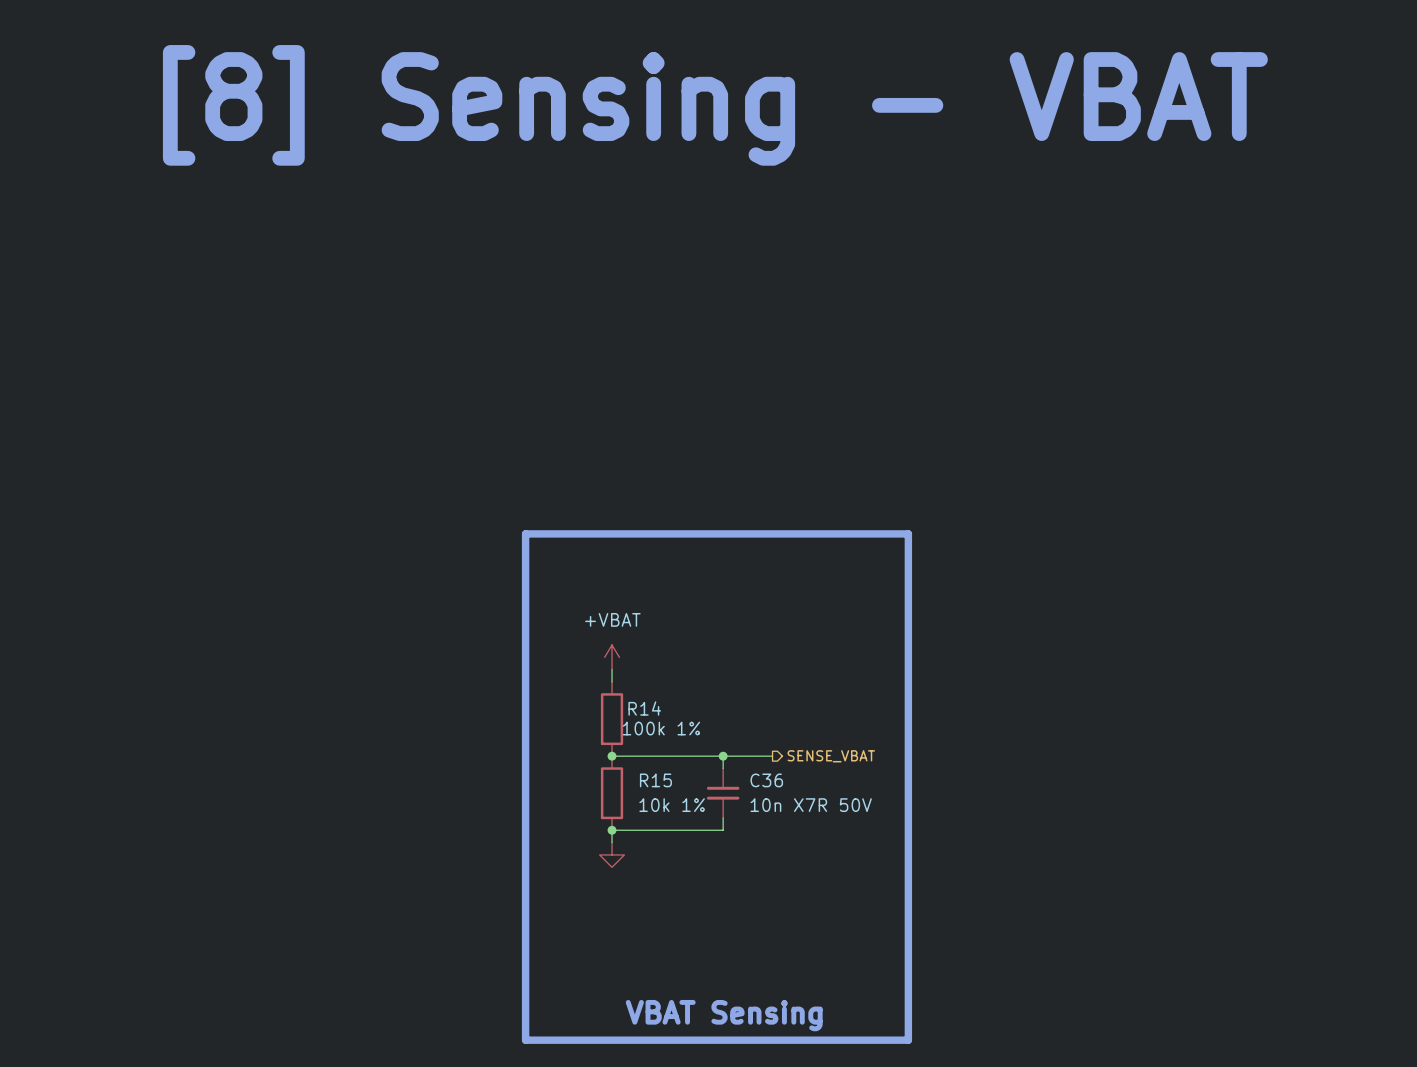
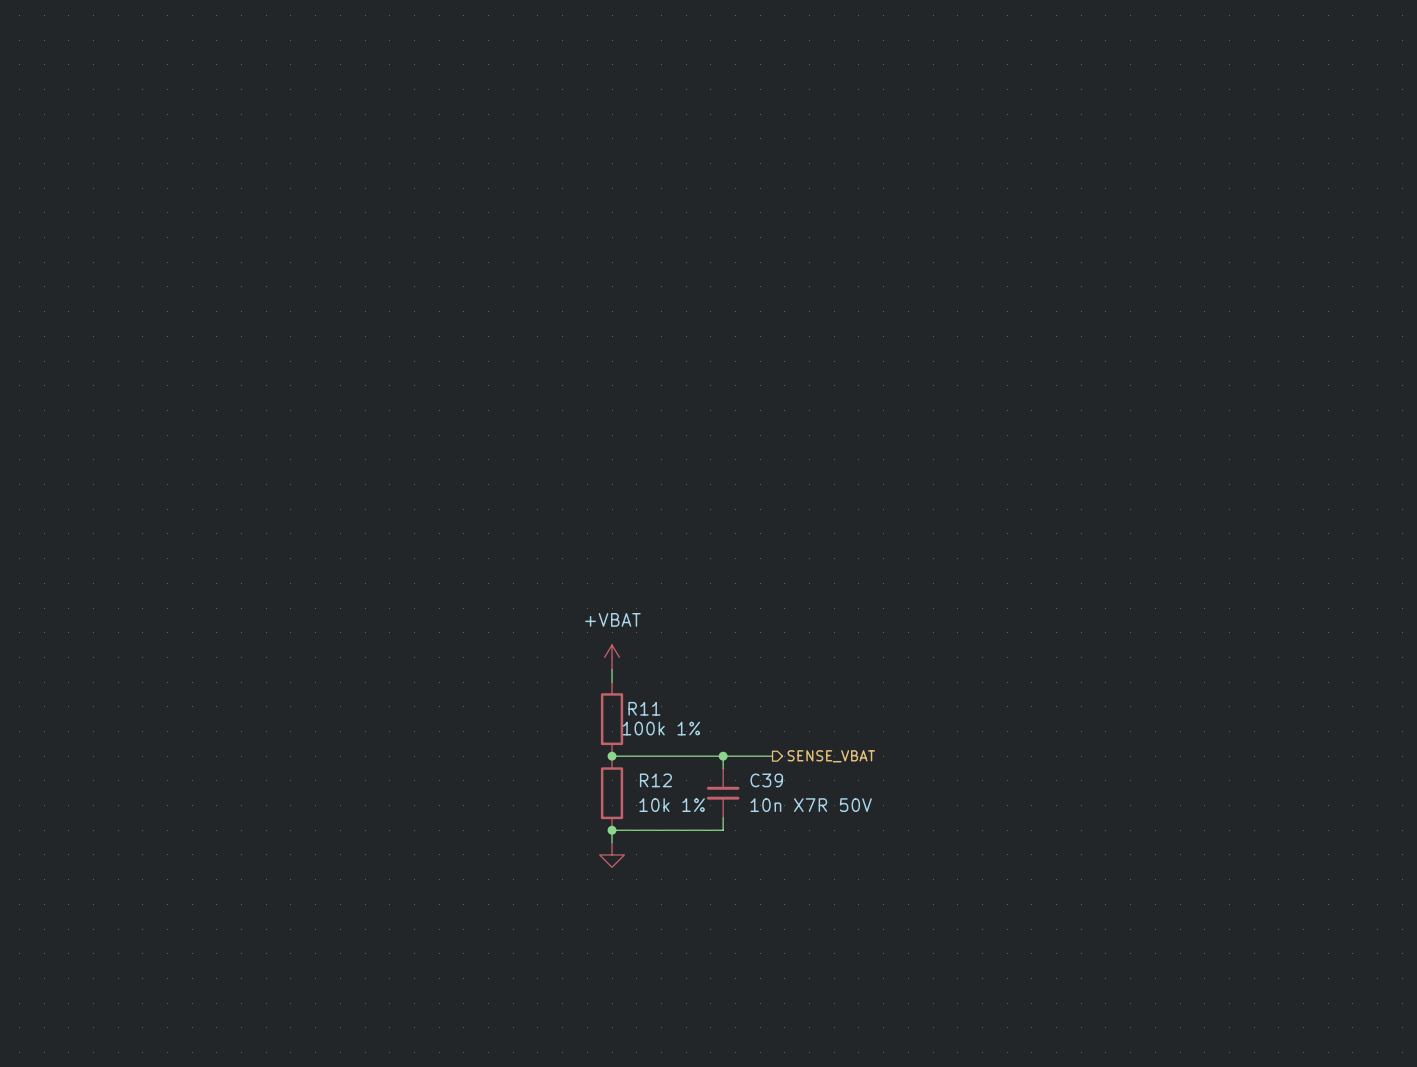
text: [8] Sensing - VBAT (715, 105) -> none
line: (525, 533) (908, 533) (908, 1040) (525, 1040) (525, 533) -> none
R14 name: R14 (644, 708) -> R11 (644, 708)
R15 name: R15 (655, 780) -> R12 (655, 780)
C36 name: C36 (766, 780) -> C39 (766, 780)
text: VBAT Sensing (724, 1015) -> none

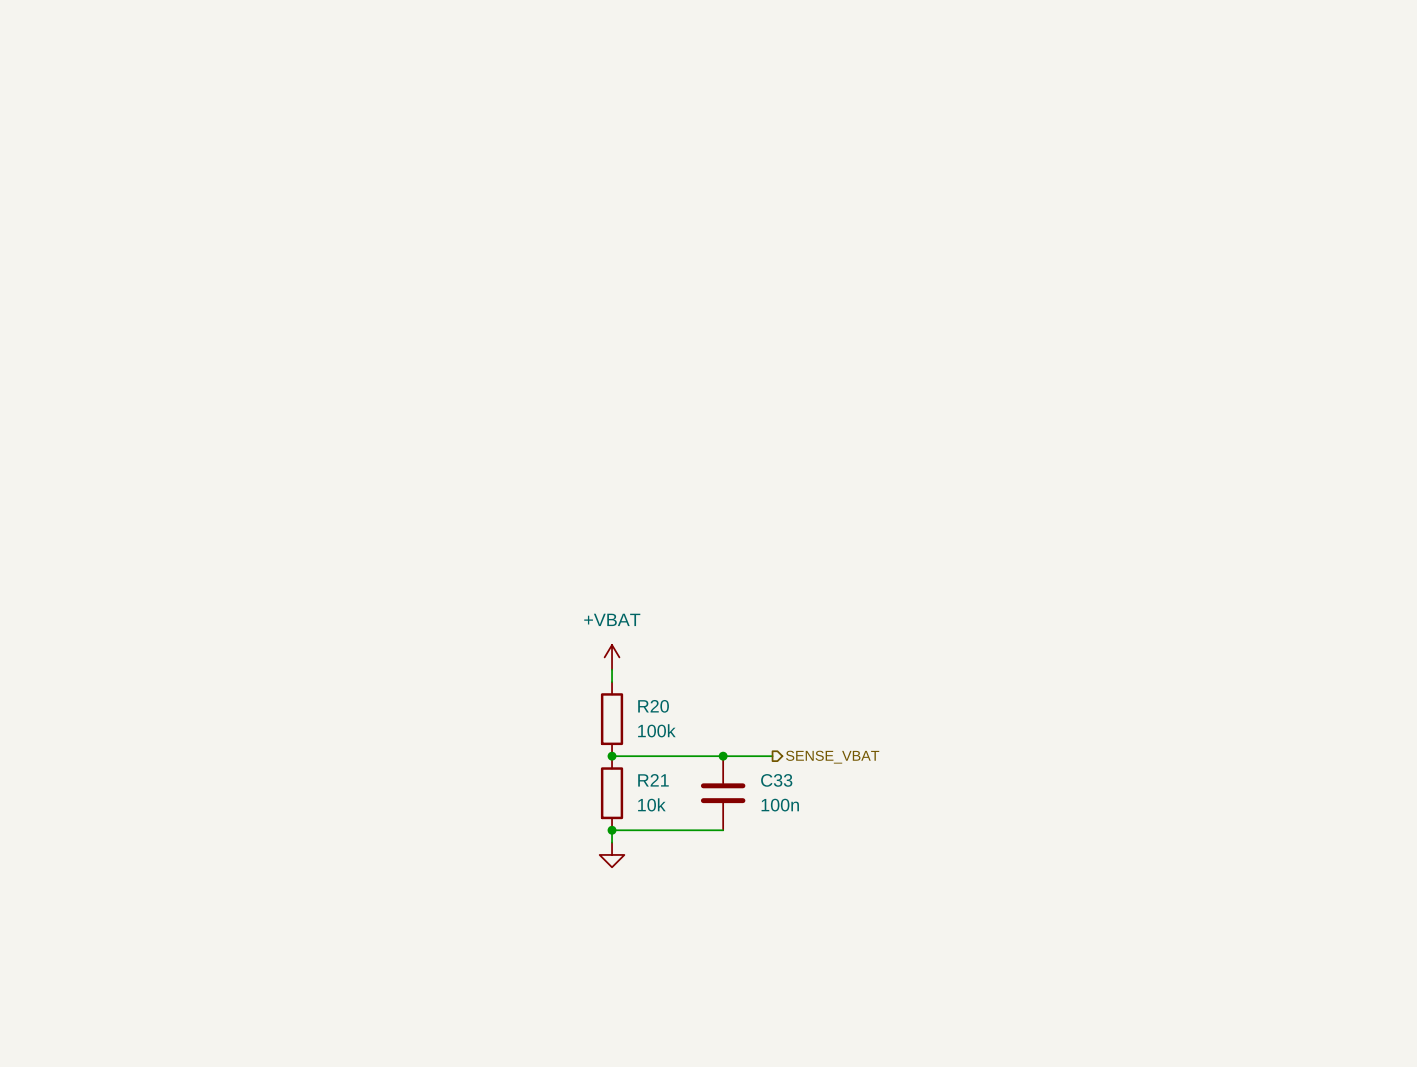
R11 name: R11 (644, 708) -> R20 (653, 706)
R11 value: 100k 1% (661, 728) -> 100k (656, 730)
R12 name: R12 (655, 780) -> R21 (653, 780)
C39: 10n X7R 50V (723, 793) -> none
C33: none -> 100n (723, 793)
R12 value: 10k 1% (672, 805) -> 10k (651, 804)

